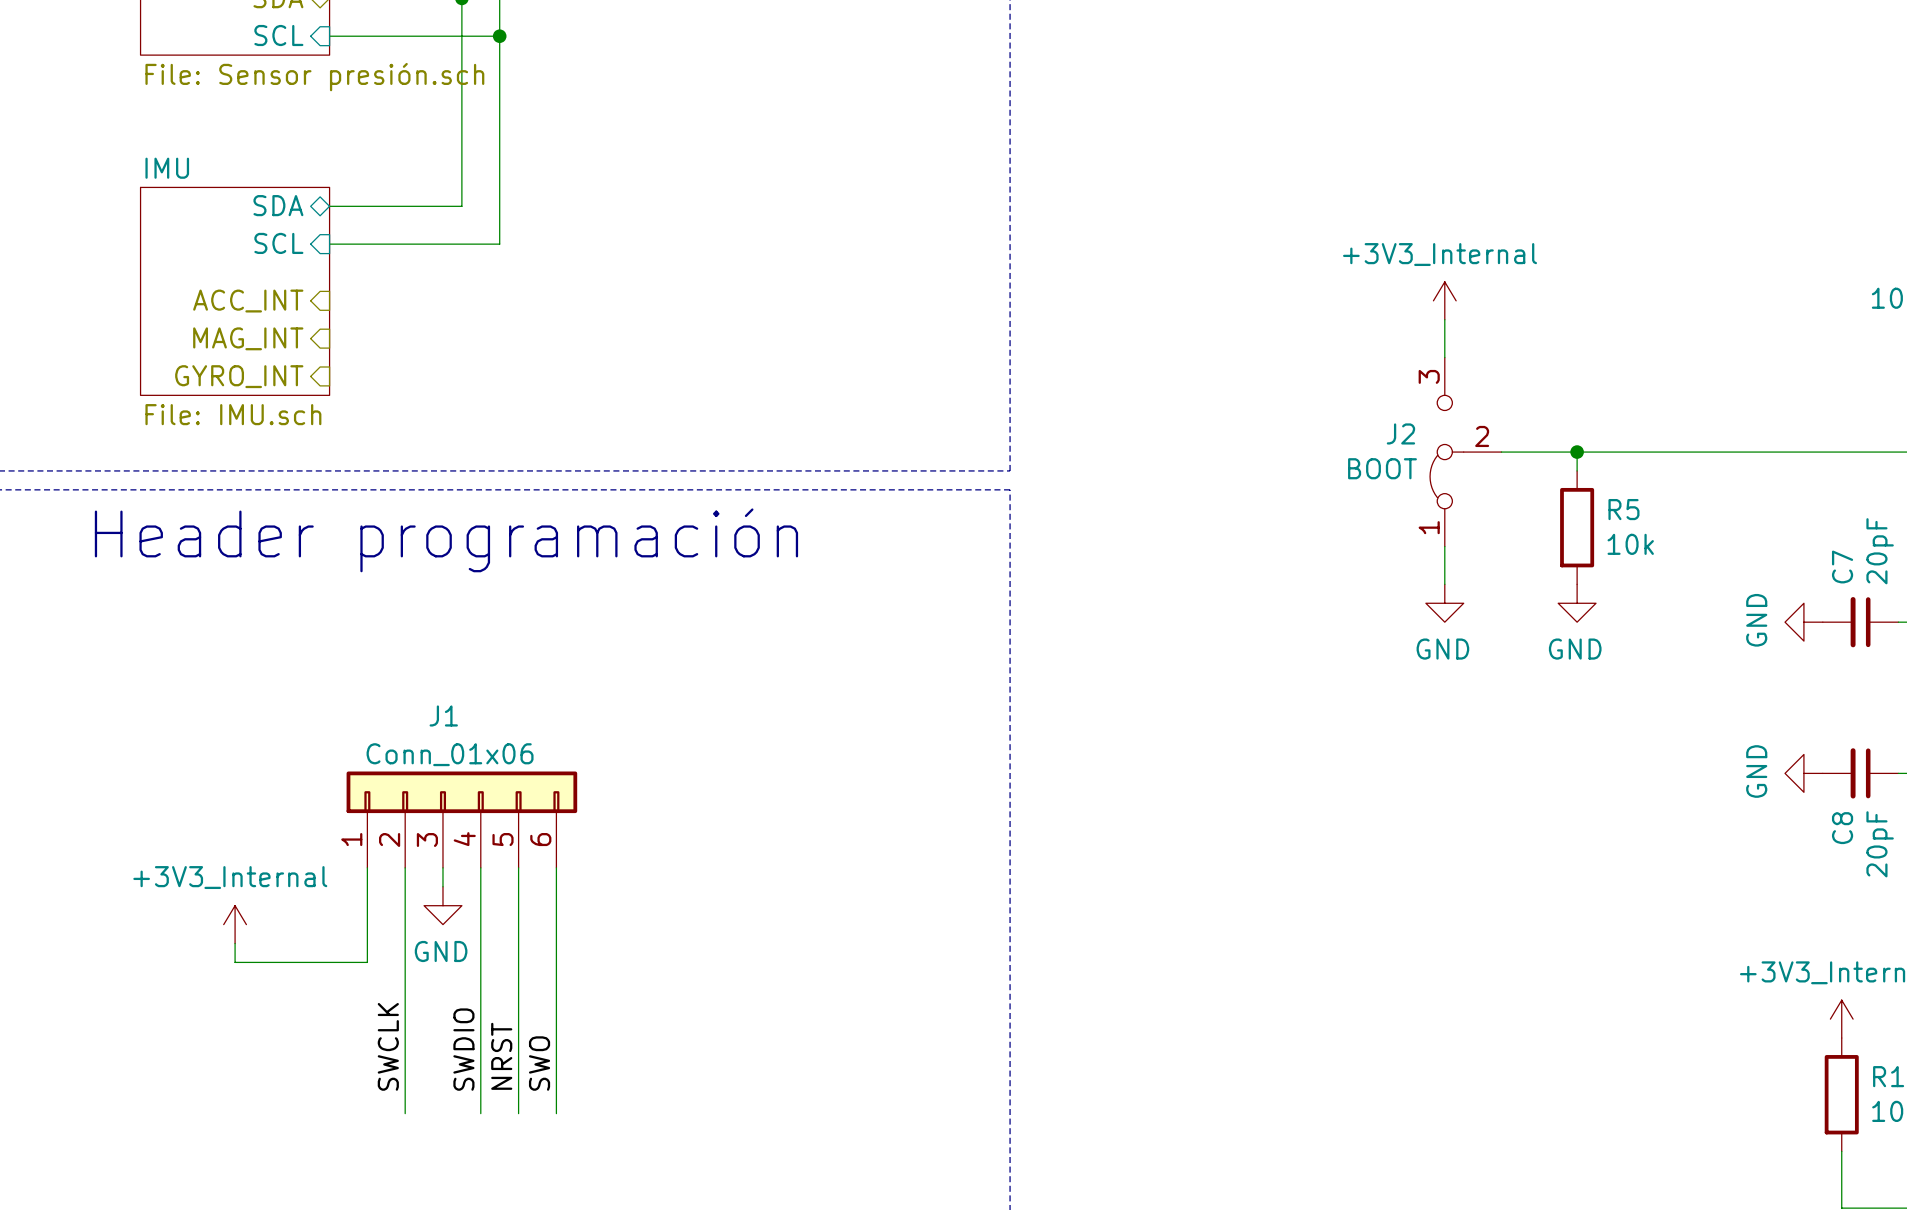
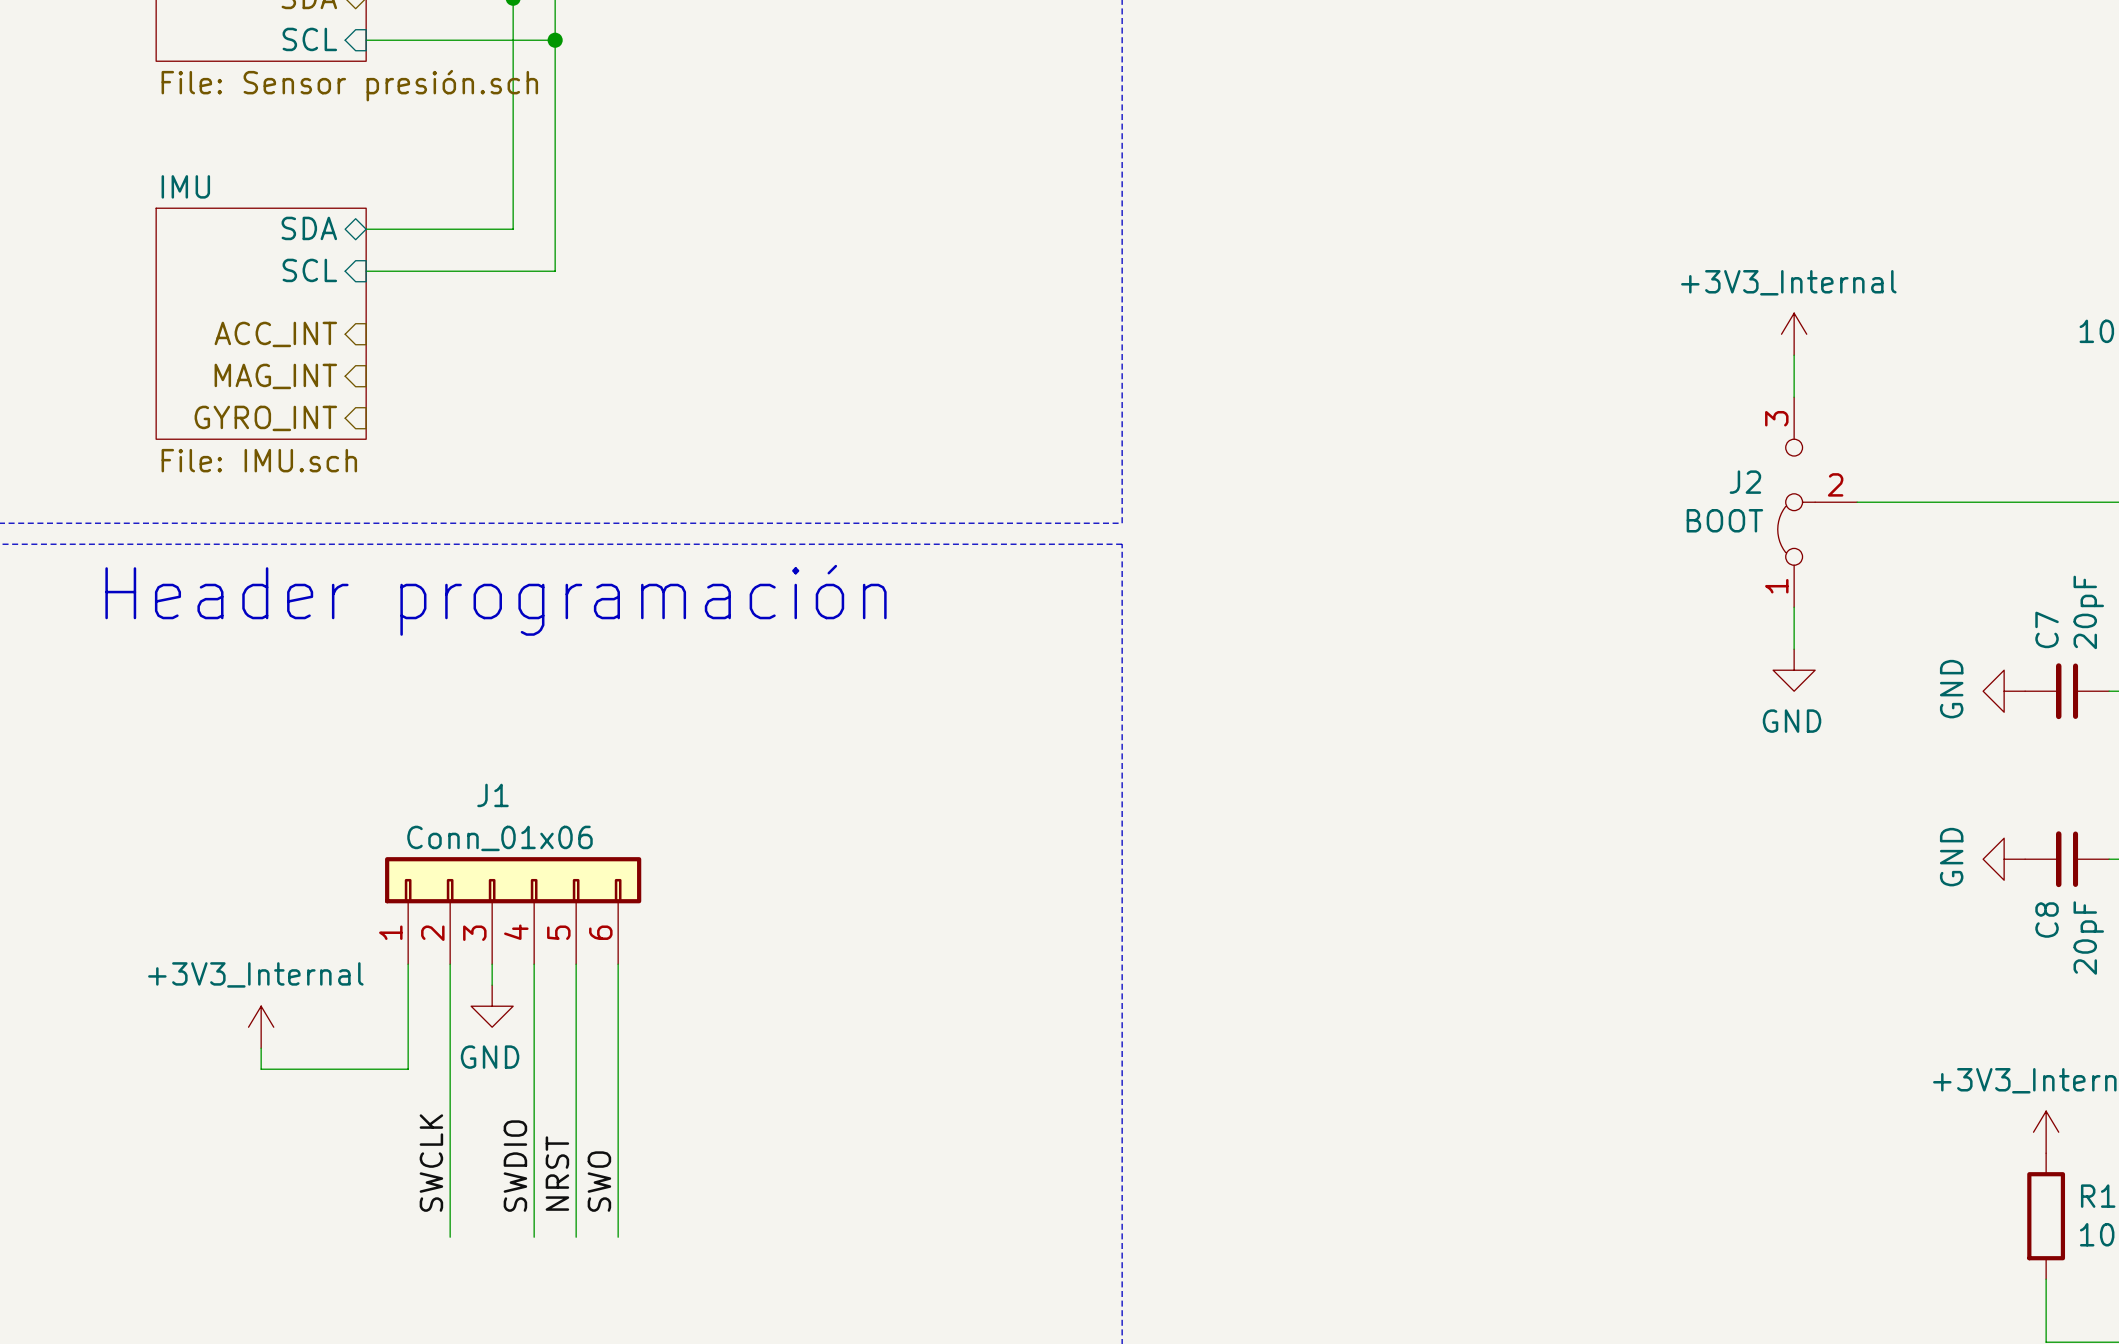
power symbol position: +3V3_Internal (1444, 300) -> +3V3_Internal (1794, 334)
wire: (1444, 319) (1444, 357) -> (1794, 355) (1794, 397)
J2 position: (1465, 452) -> (1817, 502)
wire: (1501, 452) (1671, 452) -> none
wire: (1577, 452) (1577, 470) -> none
junction: (1577, 452) -> none
R5: 10k (1577, 527) -> none
wire: (1444, 546) (1444, 584) -> (1794, 607) (1794, 649)
power symbol: GND (1444, 603) -> none
power symbol position: GND (1577, 603) -> GND (1794, 670)

